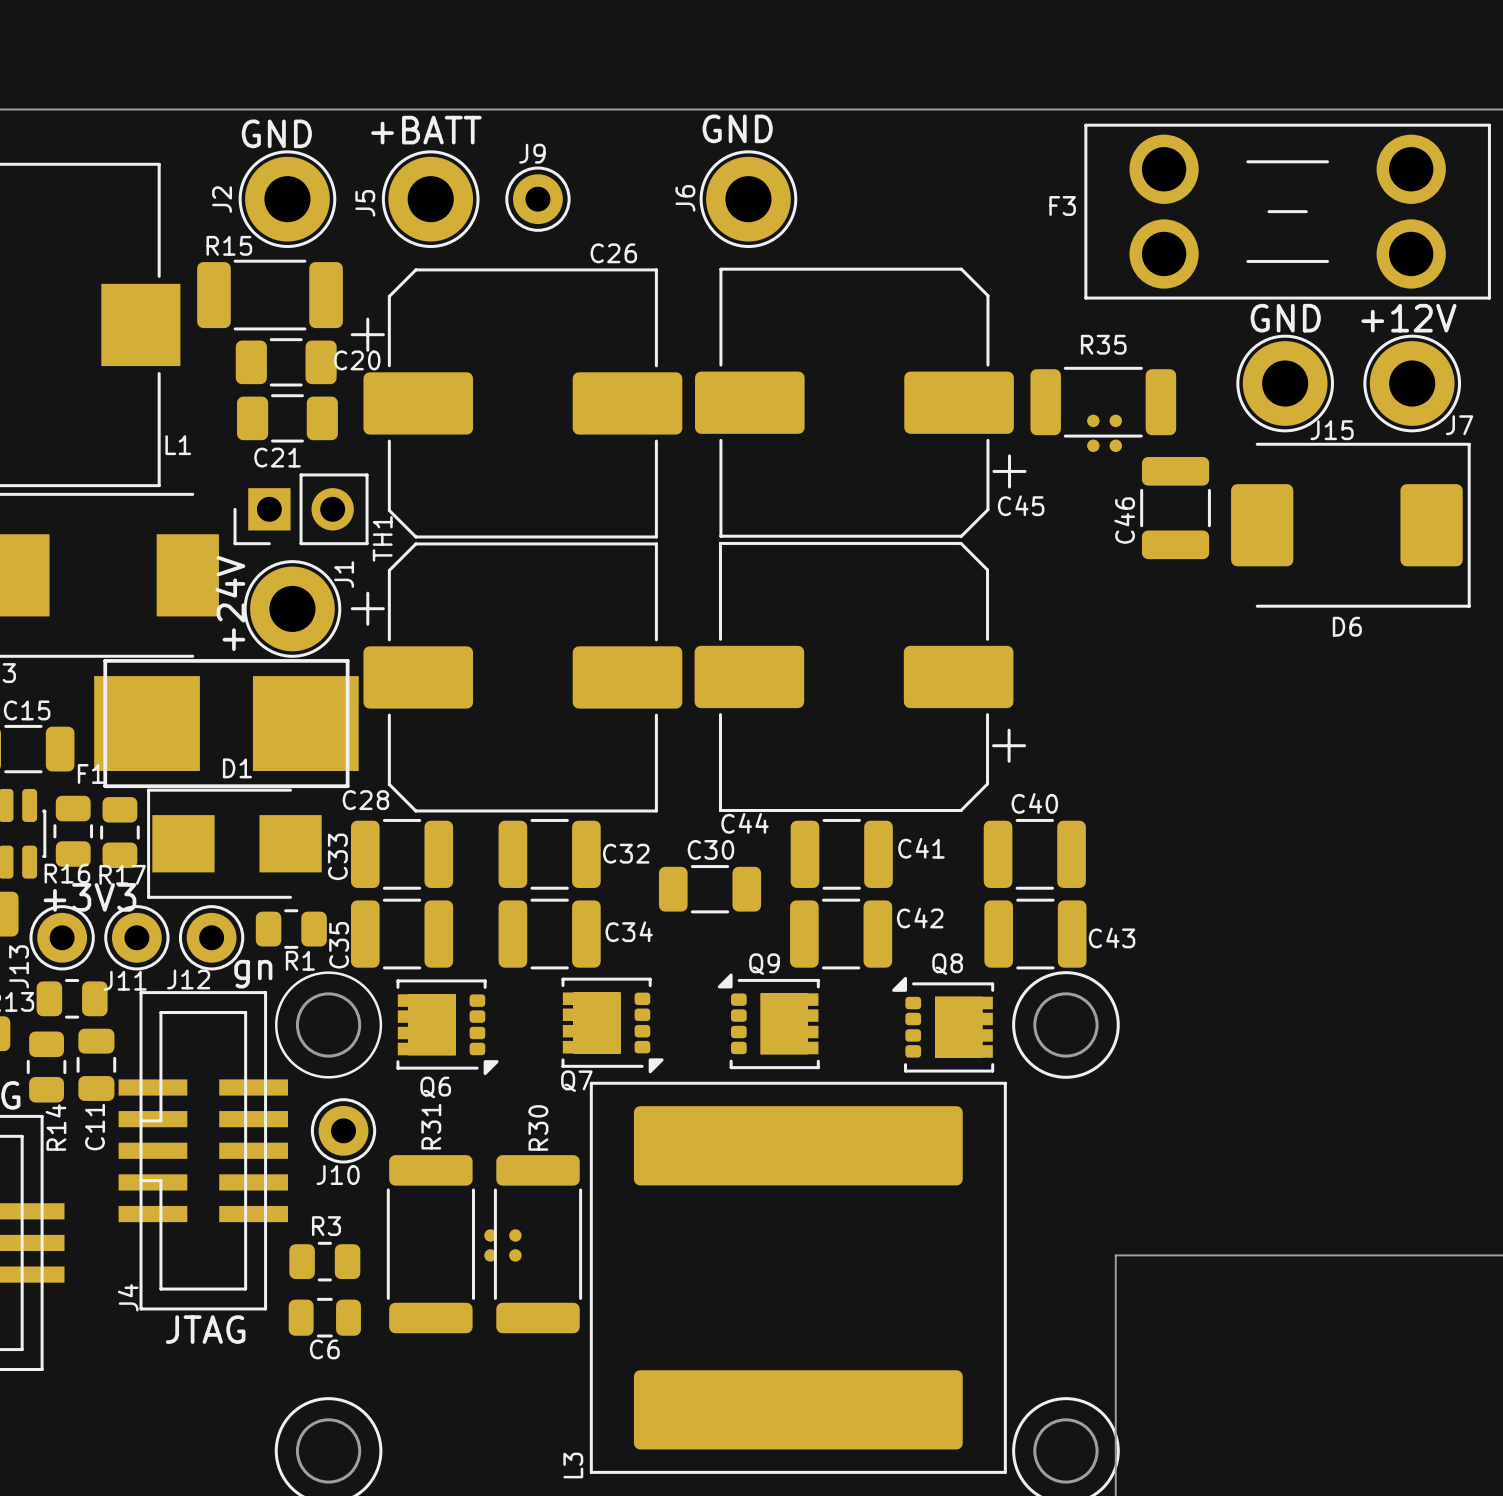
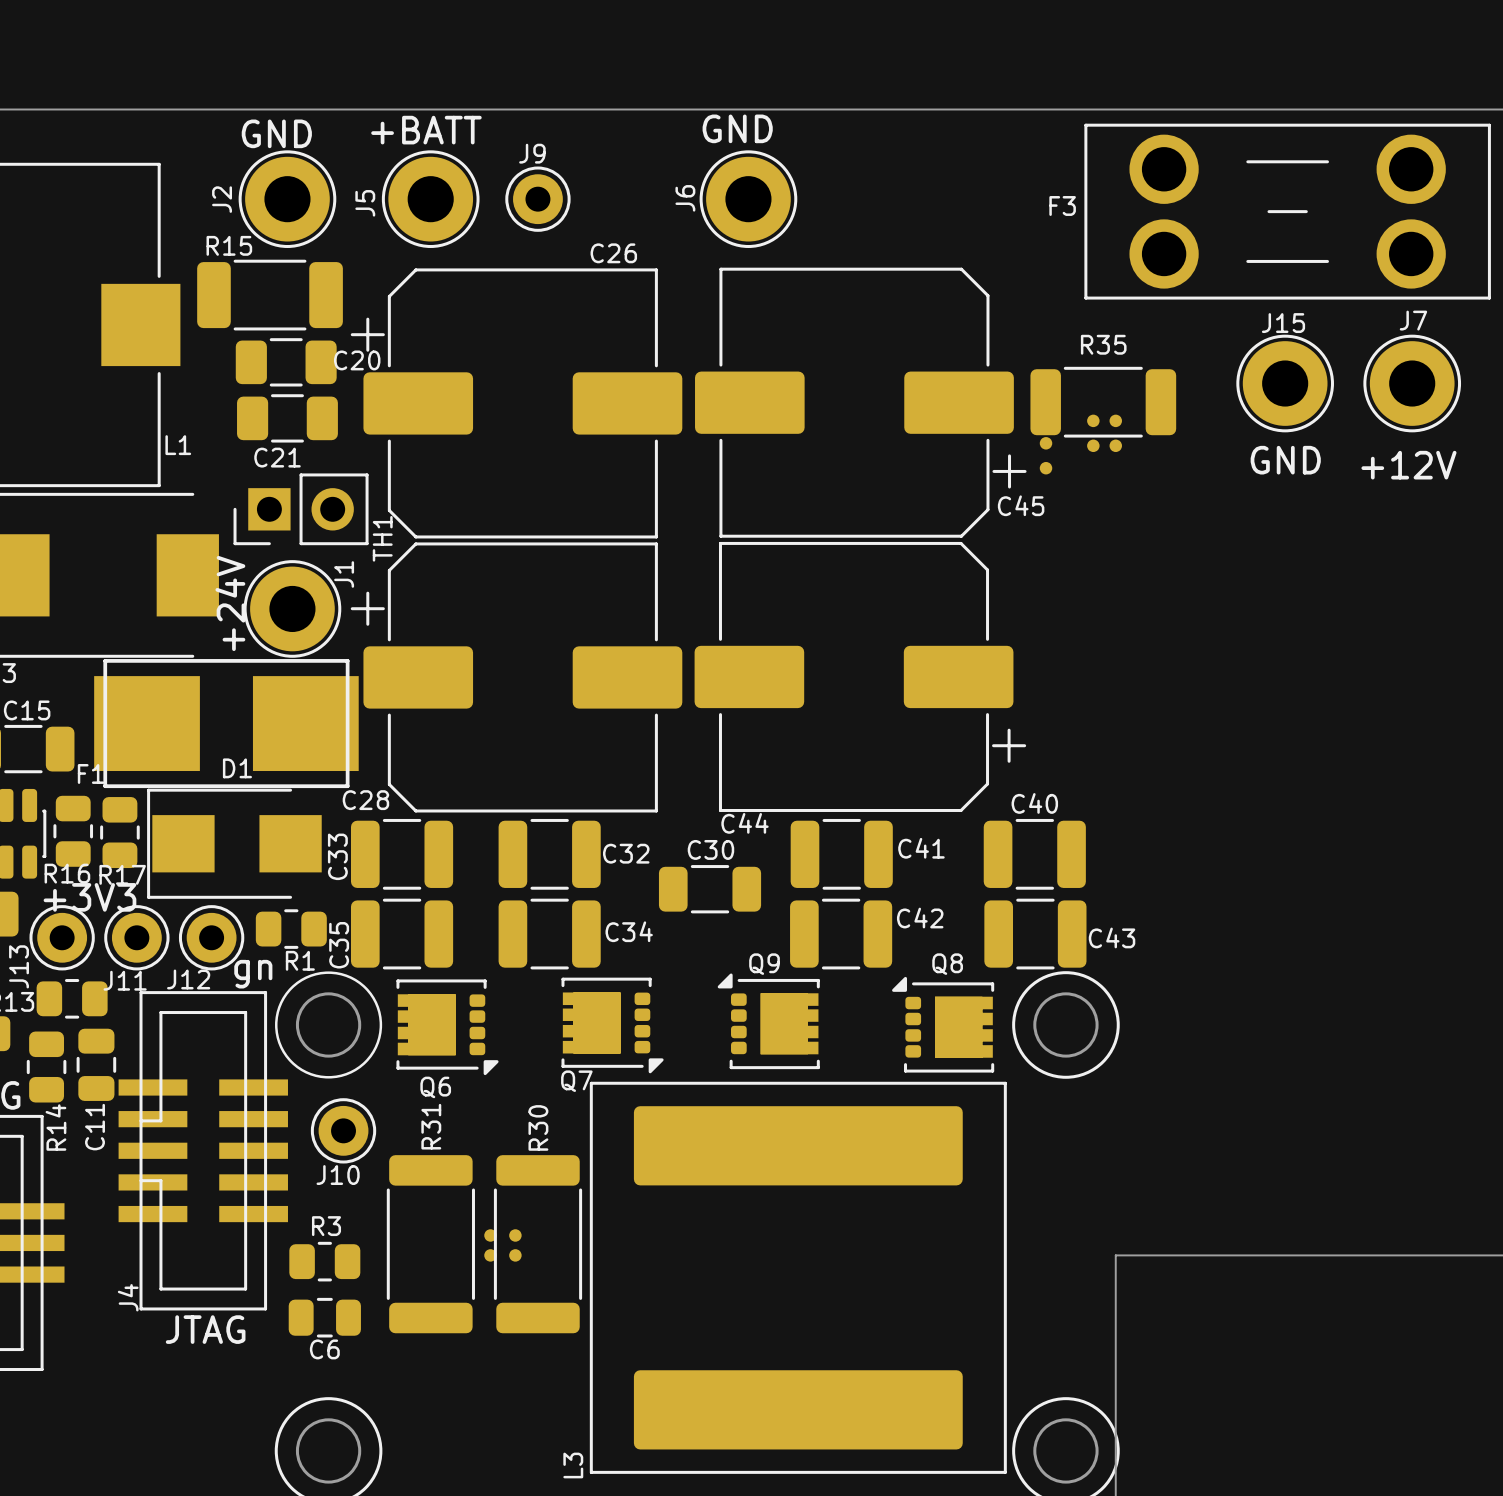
text position: GND (1285, 318) -> GND (1285, 460)
text position: +12V (1408, 318) -> +12V (1408, 465)
J7 name position: J7 (1459, 425) -> J7 (1413, 320)
J15 name position: J15 (1332, 430) -> J15 (1283, 323)
part: none -> (1046, 455)
C46: (1175, 508) -> none
D6: (1350, 525) -> none

